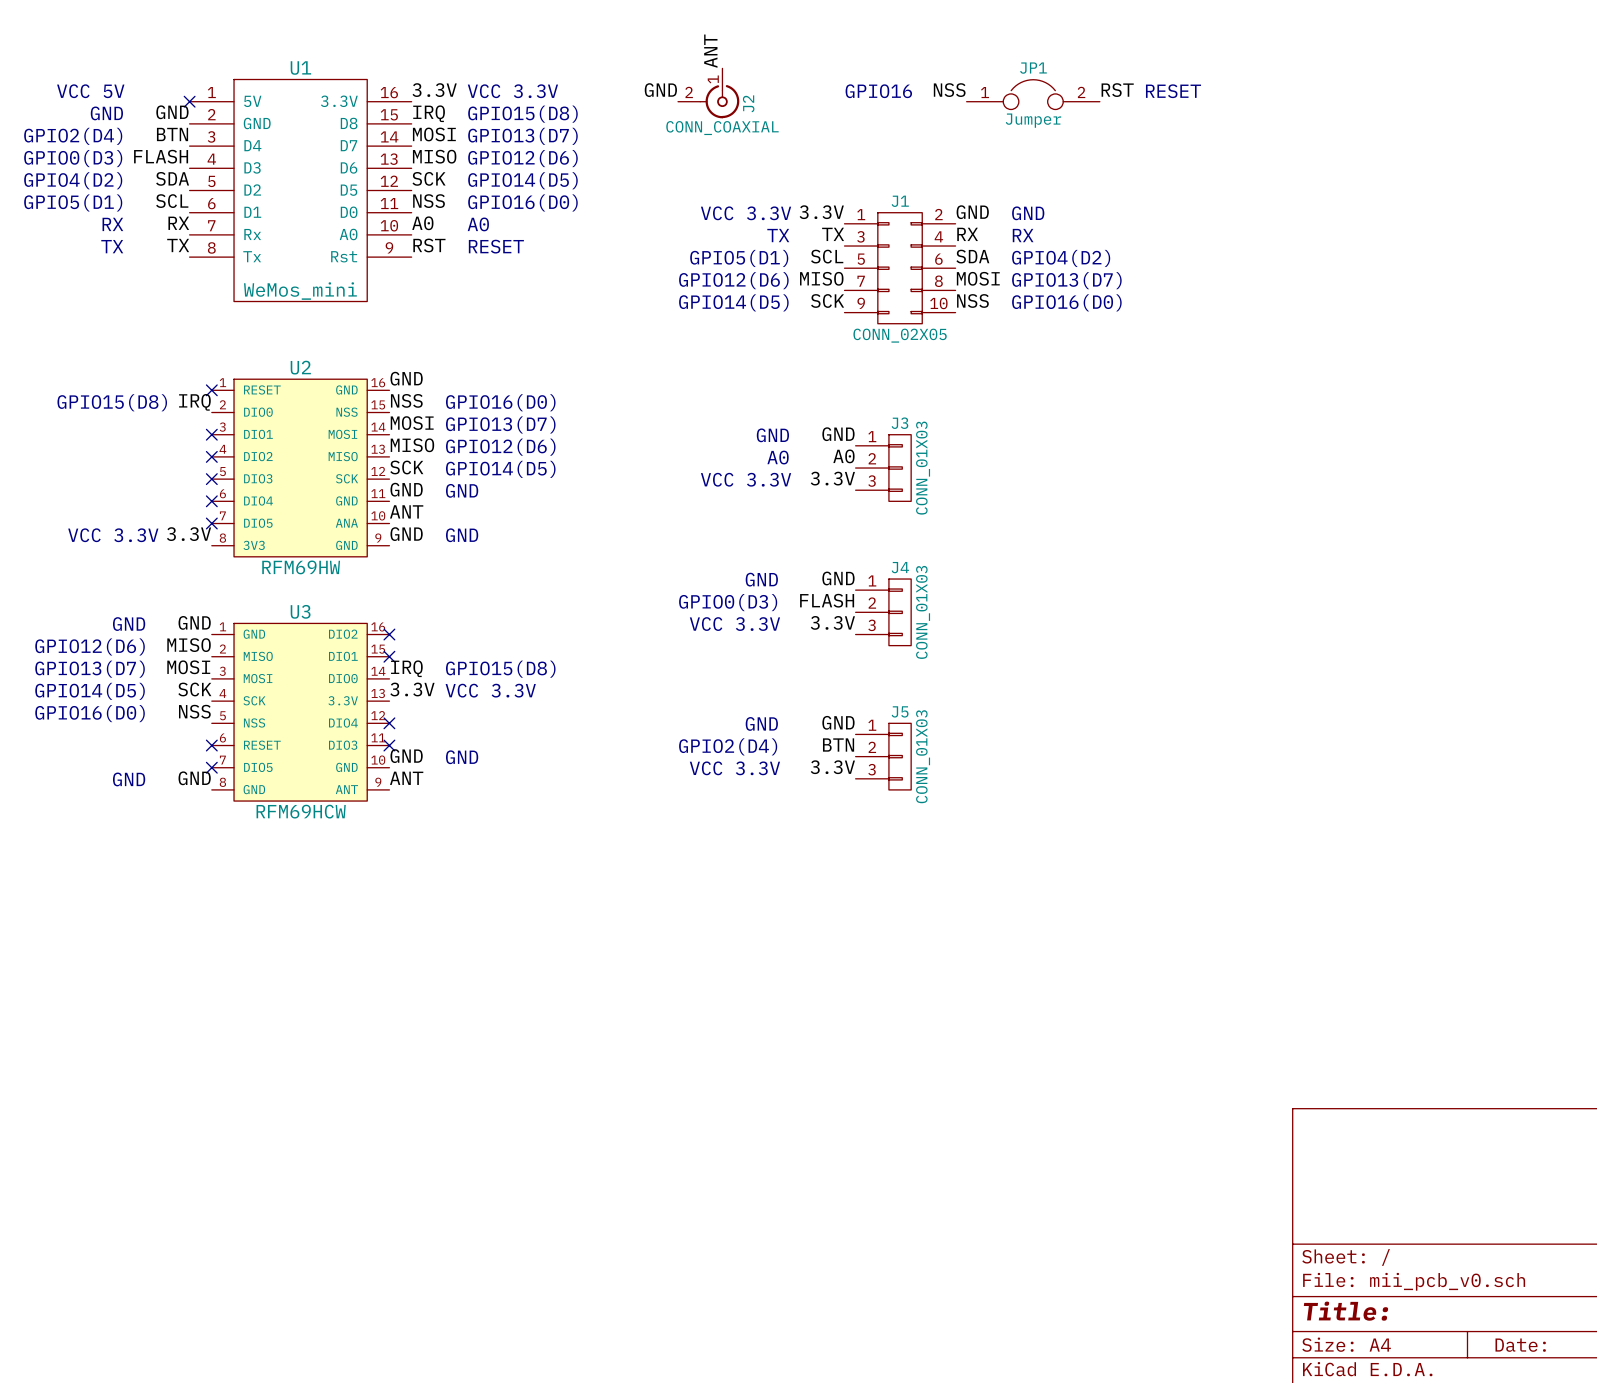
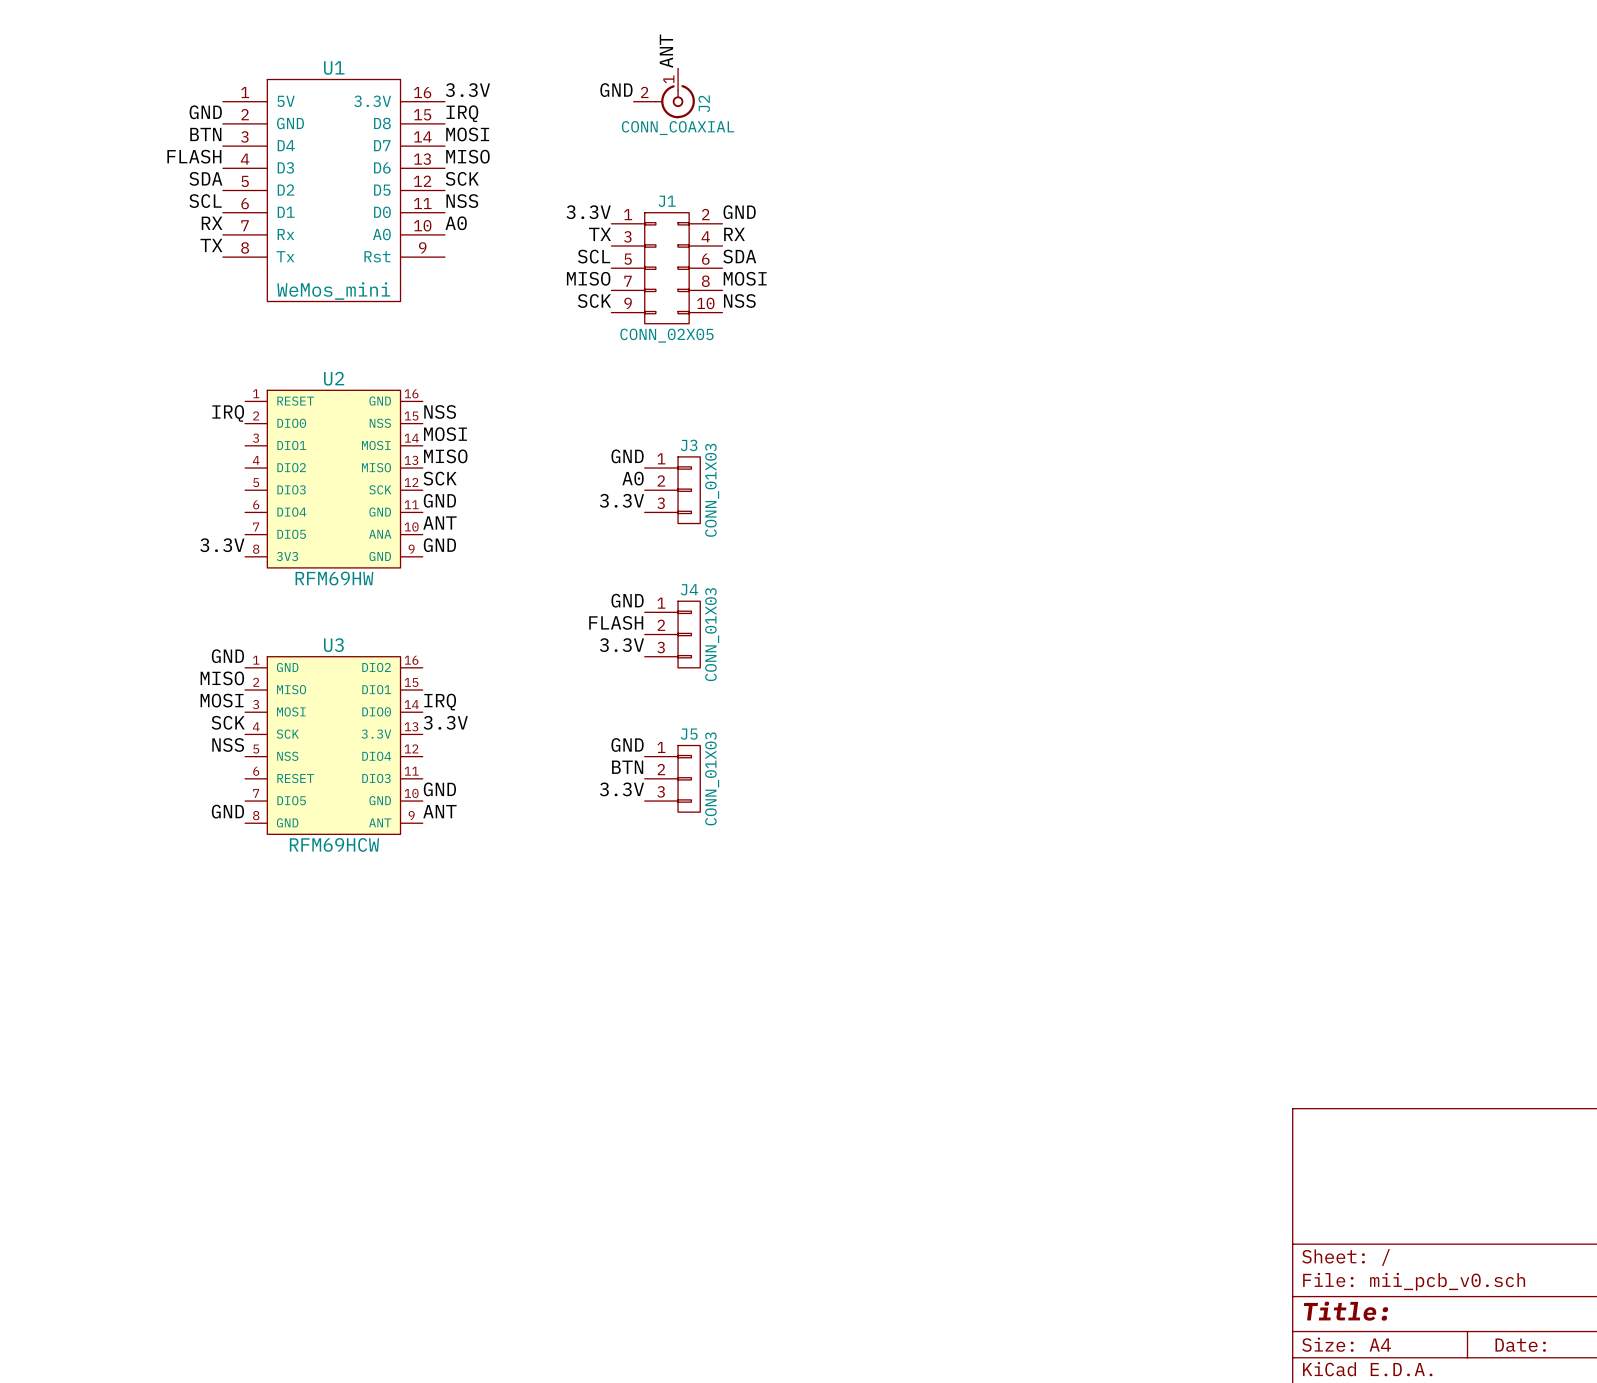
label position: ANT (710, 51) -> ANT (666, 51)
label position: 3.3V (434, 90) -> 3.3V (467, 90)
label position: GND (660, 90) -> GND (616, 90)
label: NSS (949, 90) -> none
label: RST (1117, 90) -> none
text: VCC 5V (90, 91) -> none
text: VCC 3.3V (512, 91) -> none
text: GPIO16 (878, 91) -> none
text: RESET (1173, 91) -> none
J2 position: (708, 93) -> (664, 93)
JP1: Jumper (1033, 94) -> none
no-connect mark: (189, 101) -> none
label position: GND (172, 112) -> GND (205, 112)
text: GND (106, 113) -> none
label position: IRQ (429, 113) -> IRQ (462, 113)
text: GPIO15(D8) (522, 114) -> none
label position: BTN (172, 134) -> BTN (205, 134)
label position: MOSI (434, 134) -> MOSI (467, 134)
text: GPIO2(D4) (73, 136) -> none
text: GPIO13(D7) (522, 136) -> none
label position: FLASH (161, 156) -> FLASH (194, 156)
label position: MISO (434, 156) -> MISO (467, 156)
text: GPIO0(D3) (73, 158) -> none
text: GPIO12(D6) (522, 158) -> none
label position: SDA (172, 178) -> SDA (205, 178)
label position: SCK (429, 178) -> SCK (462, 178)
text: GPIO4(D2) (73, 180) -> none
text: GPIO14(D5) (522, 180) -> none
U1 position: (300, 190) -> (333, 190)
label position: SCL (172, 201) -> SCL (205, 201)
label position: NSS (429, 201) -> NSS (462, 201)
text: GPIO5(D1) (73, 202) -> none
text: GPIO16(D0) (522, 202) -> none
label: none -> 3.3V (588, 212)
label: none -> GND (739, 212)
label: 3.3V (821, 212) -> none
label: GND (972, 212) -> none
text: VCC 3.3V (746, 213) -> none
text: GND (1028, 213) -> none
label position: RX (178, 223) -> RX (212, 223)
label position: A0 (422, 223) -> A0 (456, 223)
text: RX (112, 224) -> none
text: A0 (478, 224) -> none
label: none -> TX (599, 234)
label: none -> RX (734, 234)
label: TX (833, 234) -> none
label: RX (967, 234) -> none
text: TX (778, 235) -> none
text: RX (1023, 235) -> none
label position: TX (178, 245) -> TX (211, 245)
label: RST (429, 245) -> none
text: TX (112, 246) -> none
text: RESET (496, 246) -> none
label: none -> SCL (594, 256)
label: none -> SDA (739, 256)
label: SCL (827, 256) -> none
label: SDA (972, 256) -> none
text: GPIO5(D1) (739, 258) -> none
text: GPIO4(D2) (1061, 258) -> none
J1 position: (900, 268) -> (666, 268)
label: none -> MISO (588, 278)
label: none -> MOSI (745, 278)
label: MISO (821, 278) -> none
label: MOSI (978, 278) -> none
text: GPIO12(D6) (733, 280) -> none
text: GPIO13(D7) (1066, 280) -> none
label: none -> SCK (594, 300)
label: none -> NSS (739, 300)
label: SCK (827, 300) -> none
label: NSS (972, 300) -> none
text: GPIO14(D5) (733, 302) -> none
text: GPIO16(D0) (1066, 302) -> none
label: GND (406, 378) -> none
no-connect mark: (211, 390) -> none
label position: NSS (406, 400) -> NSS (440, 411)
text: GPIO15(D8) (112, 402) -> none
label position: IRQ (194, 402) -> IRQ (228, 413)
text: GPIO16(D0) (500, 402) -> none
label position: MOSI (412, 423) -> MOSI (445, 434)
text: GPIO13(D7) (500, 424) -> none
no-connect mark: (211, 434) -> none
label: GND (838, 434) -> none
text: GND (772, 435) -> none
label position: MISO (412, 445) -> MISO (445, 456)
text: GPIO12(D6) (500, 447) -> none
no-connect mark: (211, 456) -> none
label: none -> GND (627, 456)
label: A0 (843, 456) -> none
text: A0 (778, 457) -> none
label position: SCK (406, 467) -> SCK (440, 478)
U2 position: (300, 468) -> (333, 479)
J3 position: (883, 468) -> (672, 490)
text: GPIO14(D5) (500, 469) -> none
label: none -> A0 (633, 478)
label: 3.3V (832, 478) -> none
no-connect mark: (211, 479) -> none
text: VCC 3.3V (746, 479) -> none
label position: GND (406, 489) -> GND (439, 500)
text: GND (462, 490) -> none
label: none -> 3.3V (621, 500)
no-connect mark: (211, 501) -> none
label position: ANT (406, 511) -> ANT (439, 523)
no-connect mark: (211, 523) -> none
label position: 3.3V (189, 534) -> 3.3V (222, 545)
label position: GND (406, 534) -> GND (439, 545)
text: VCC 3.3V (113, 535) -> none
text: GND (462, 535) -> none
label: GND (838, 578) -> none
text: GND (761, 579) -> none
label: none -> GND (627, 600)
label position: FLASH (827, 600) -> FLASH (616, 622)
text: GPIO0(D3) (728, 602) -> none
J4 position: (883, 612) -> (672, 634)
label position: GND (194, 622) -> GND (227, 656)
label: 3.3V (832, 622) -> none
text: GND (129, 624) -> none
text: VCC 3.3V (734, 624) -> none
no-connect mark: (389, 634) -> none
label position: MISO (189, 645) -> MISO (222, 678)
label: none -> 3.3V (621, 645)
text: GPIO12(D6) (90, 646) -> none
no-connect mark: (389, 656) -> none
label position: MOSI (188, 667) -> MOSI (222, 700)
label position: IRQ (406, 668) -> IRQ (440, 702)
text: GPIO13(D7) (90, 669) -> none
text: GPIO15(D8) (500, 669) -> none
label position: SCK (194, 689) -> SCK (228, 722)
label position: 3.3V (412, 689) -> 3.3V (445, 722)
text: VCC 3.3V (490, 690) -> none
text: GPIO14(D5) (90, 691) -> none
label position: NSS (194, 711) -> NSS (228, 745)
U3 position: (300, 712) -> (333, 745)
text: GPIO16(D0) (90, 713) -> none
label: GND (838, 722) -> none
no-connect mark: (389, 723) -> none
text: GND (761, 723) -> none
no-connect mark: (211, 745) -> none
no-connect mark: (389, 745) -> none
label: none -> GND (627, 745)
label position: BTN (838, 745) -> BTN (627, 767)
text: GPIO2(D4) (728, 746) -> none
label position: GND (406, 756) -> GND (439, 789)
J5 position: (883, 756) -> (672, 778)
text: GND (462, 757) -> none
no-connect mark: (211, 767) -> none
label: 3.3V (832, 767) -> none
text: VCC 3.3V (734, 768) -> none
label position: GND (194, 778) -> GND (227, 811)
label position: ANT (406, 778) -> ANT (439, 811)
text: GND (129, 779) -> none
label: none -> 3.3V (621, 789)

